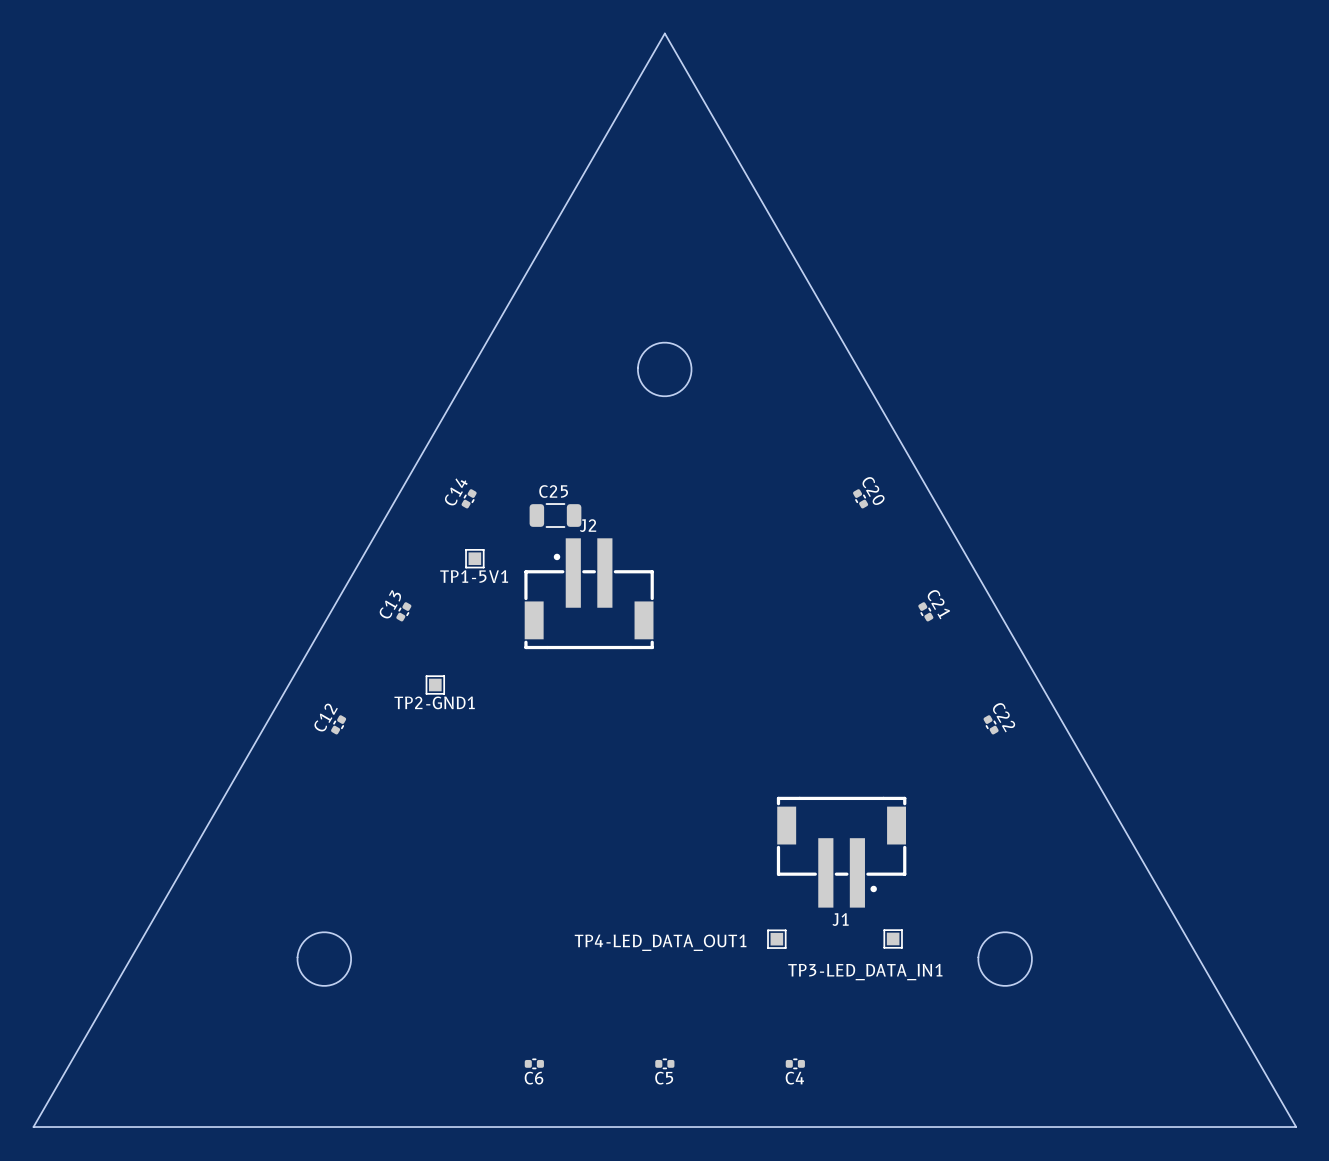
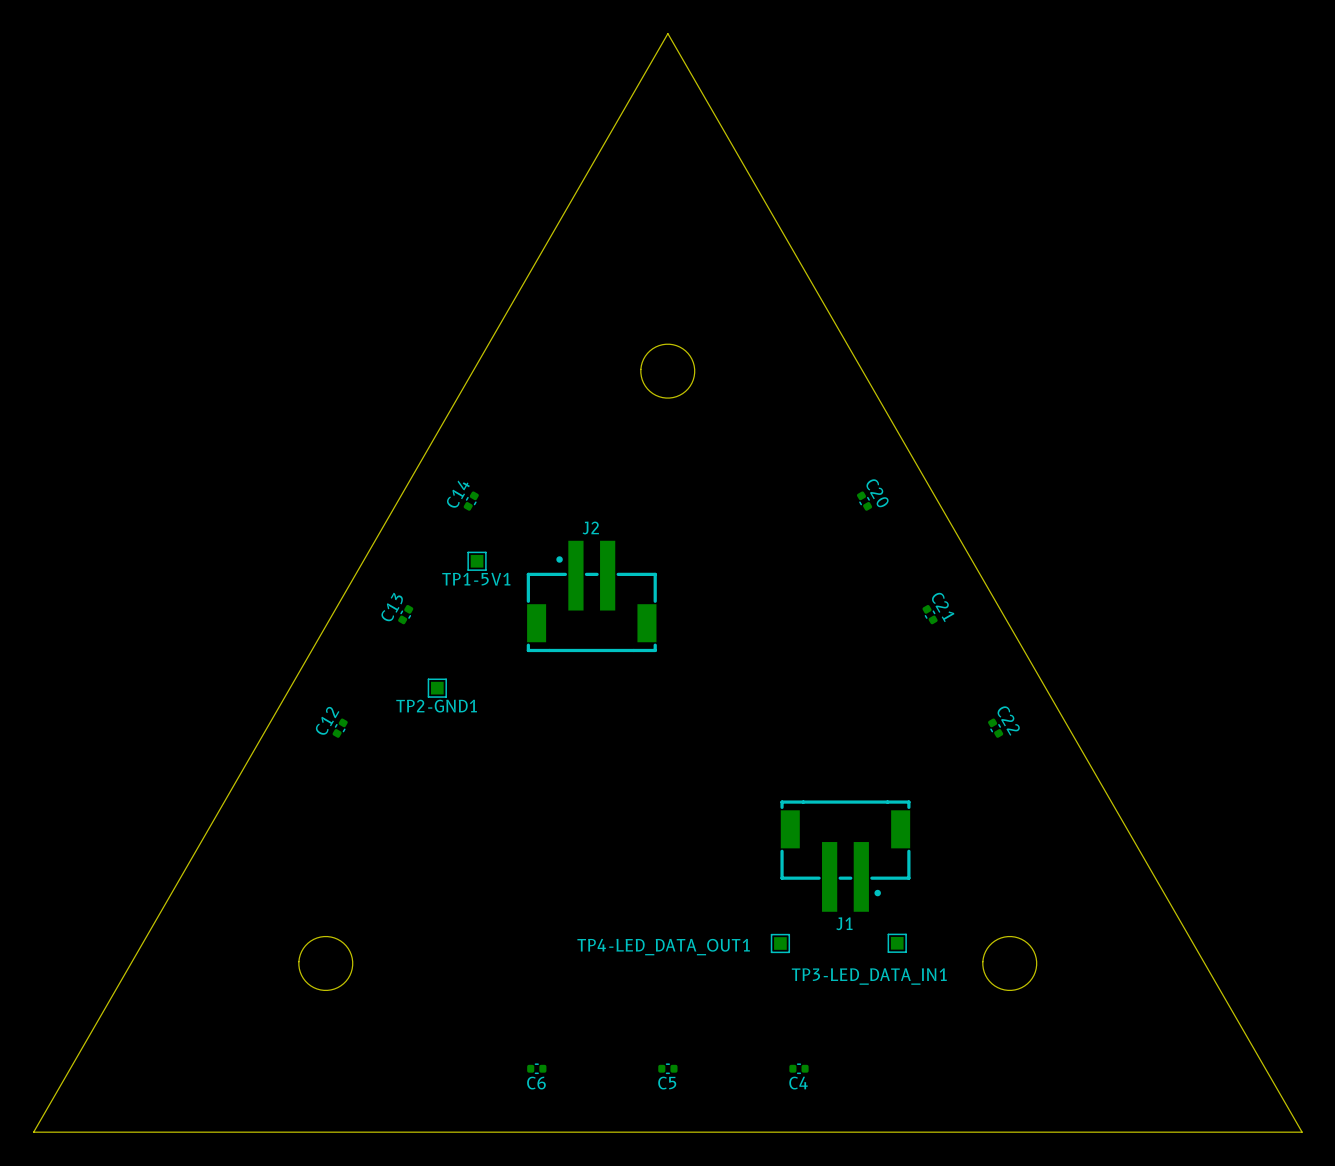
C25: (555, 515) -> none

